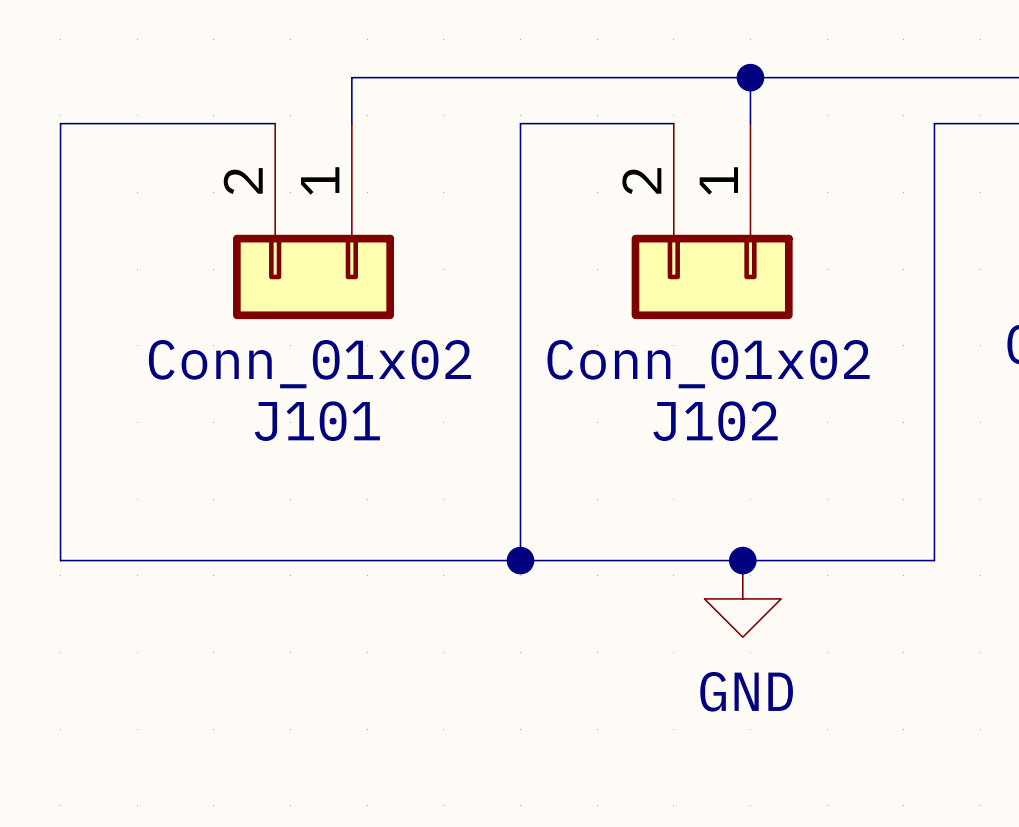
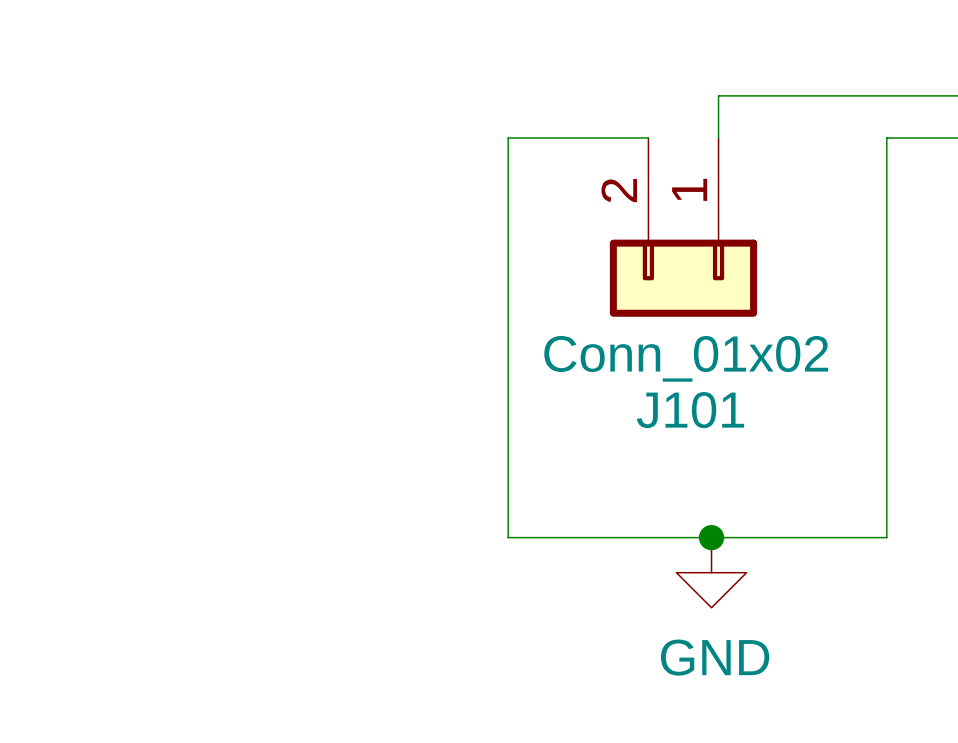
wire: (750, 77) (351, 77) (351, 123) -> none
junction: (750, 77) -> none
wire: (275, 123) (60, 123) (60, 560) (520, 560) -> none
J101: Conn_01x02 (313, 221) -> none
J102 name: J102 (715, 421) -> J101 (690, 410)
junction: (520, 560) -> none

